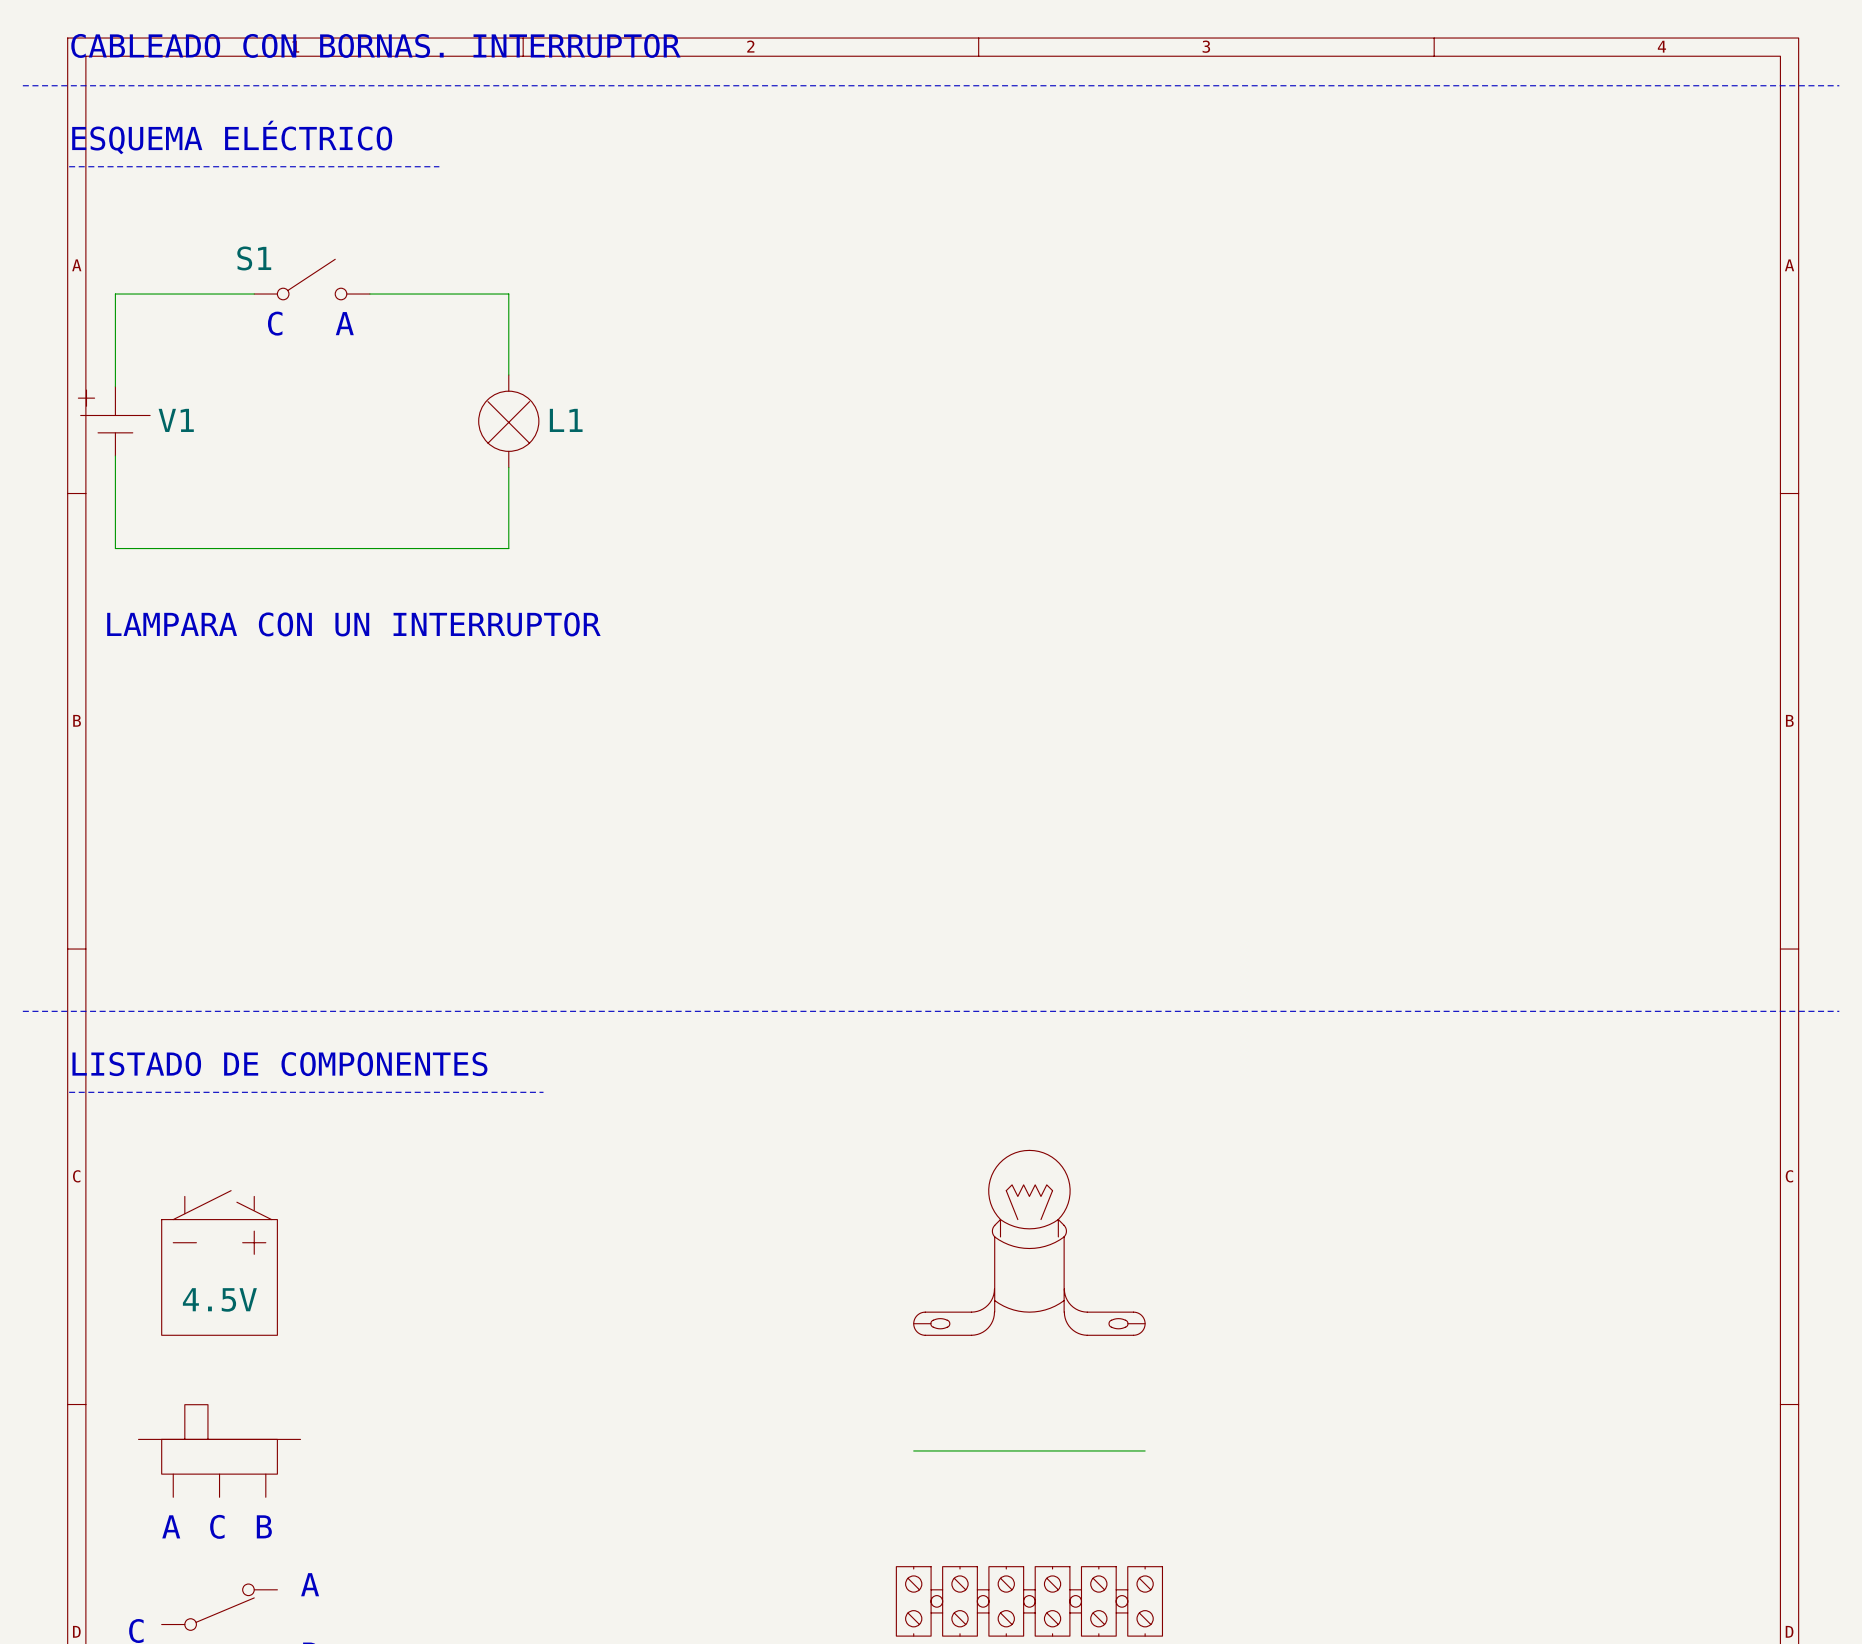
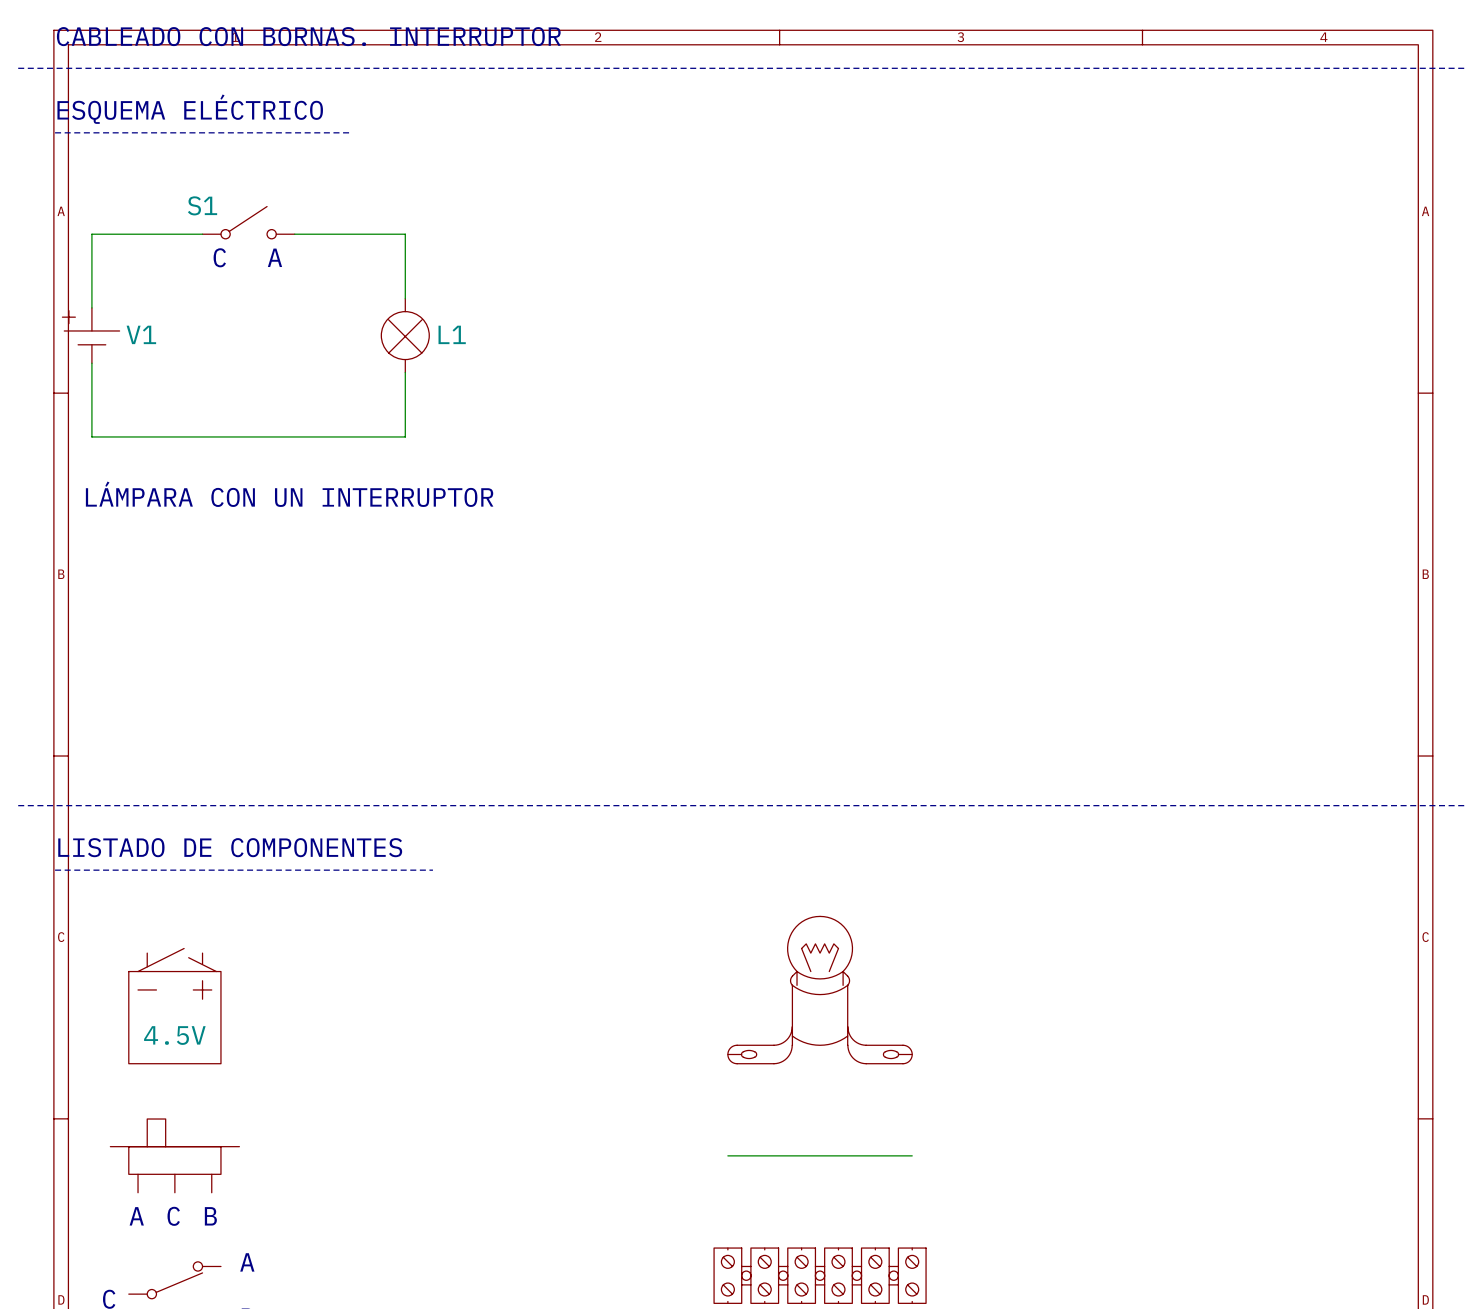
text: LAMPARA CON UN INTERRUPTOR (353, 624) -> LÁMPARA CON UN INTERRUPTOR (289, 494)

